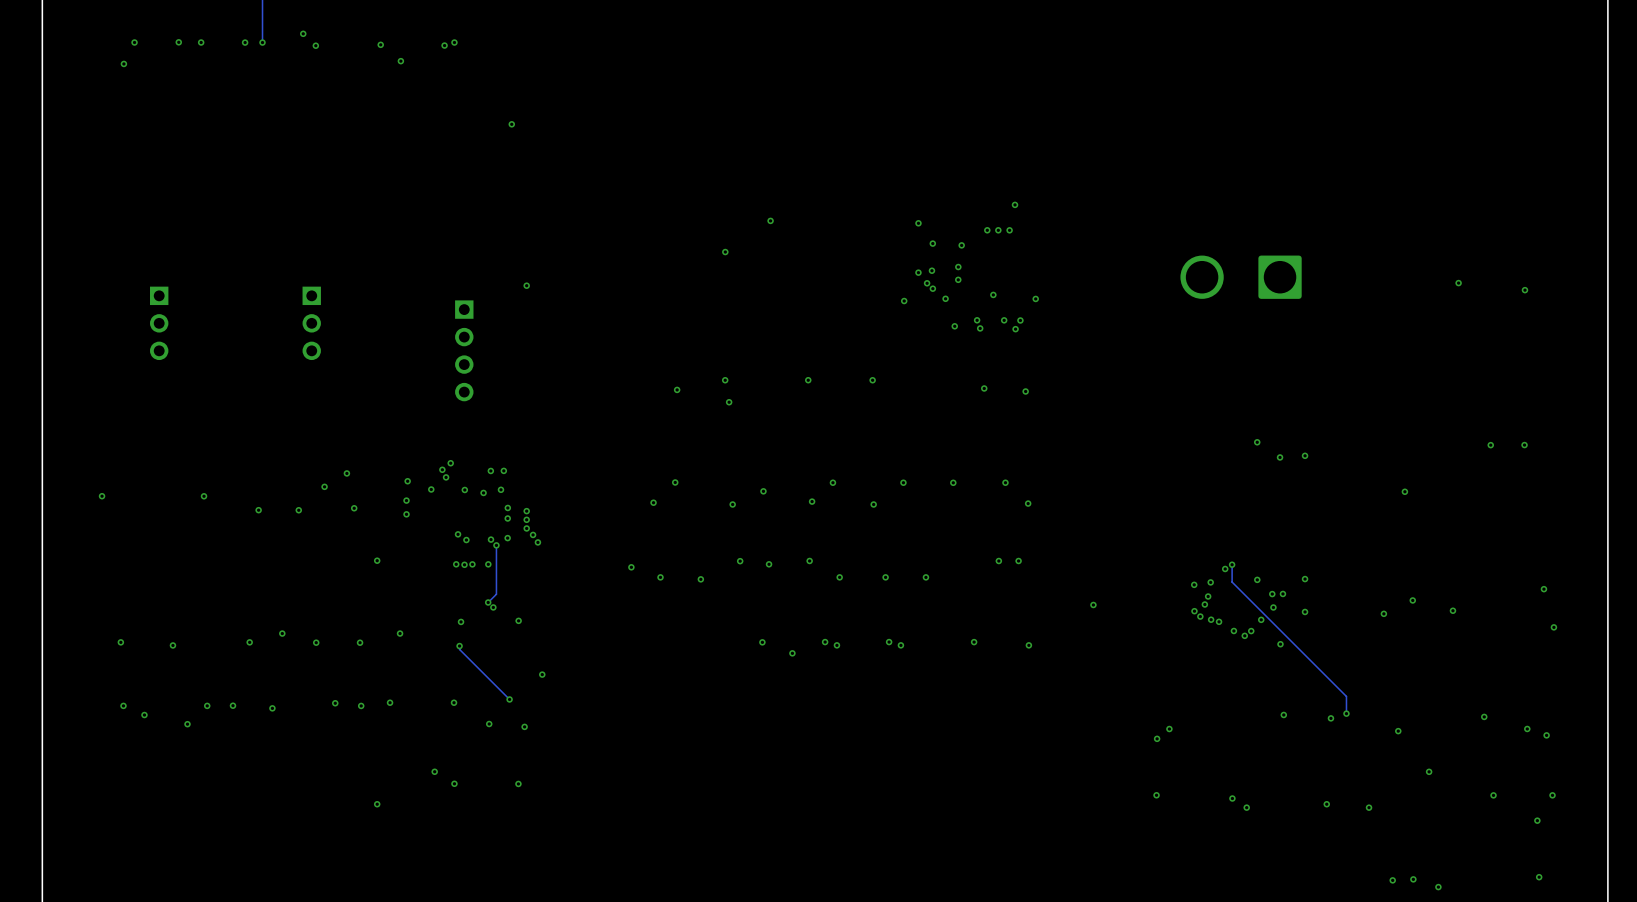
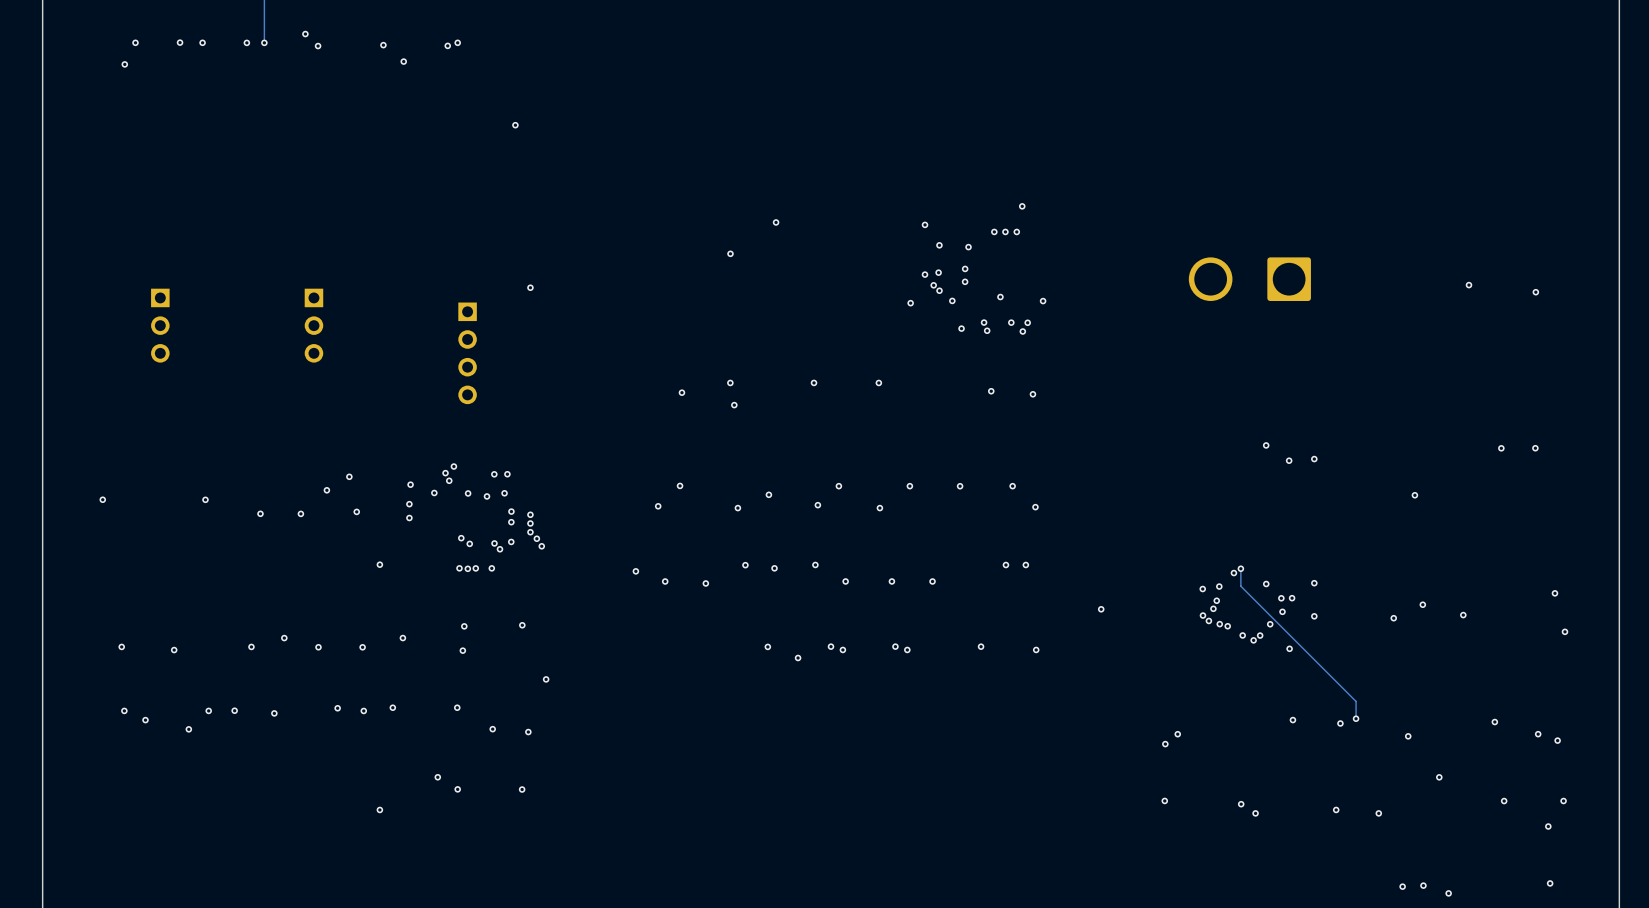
track: (496, 545) (496, 594) (488, 602) -> none
via: (488, 602) -> none
via: (493, 607) -> none
track: (459, 646) (459, 649) (509, 699) -> none
via: (509, 699) -> none

